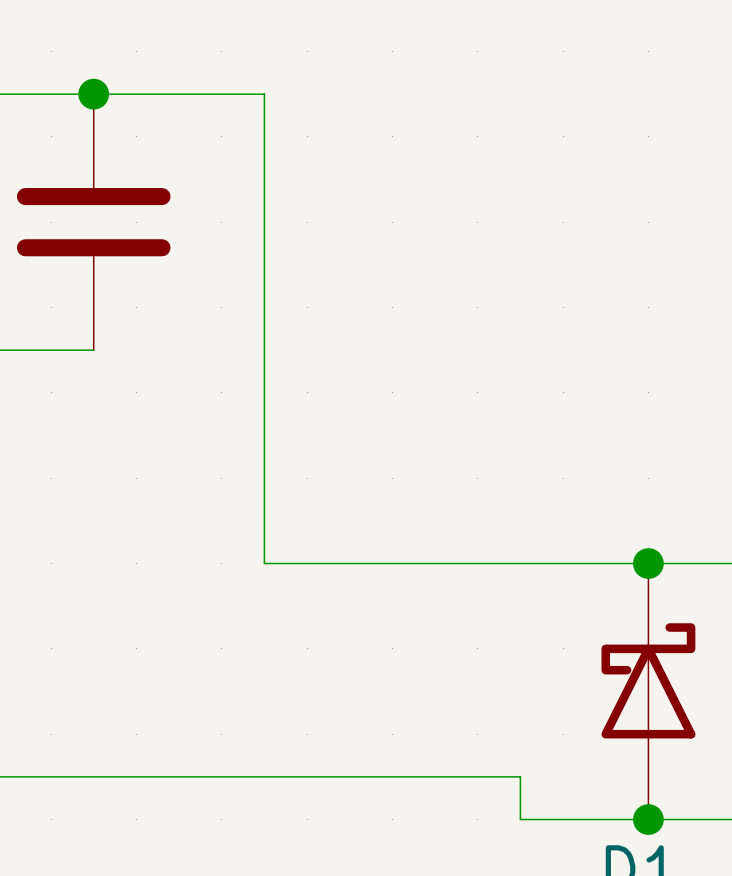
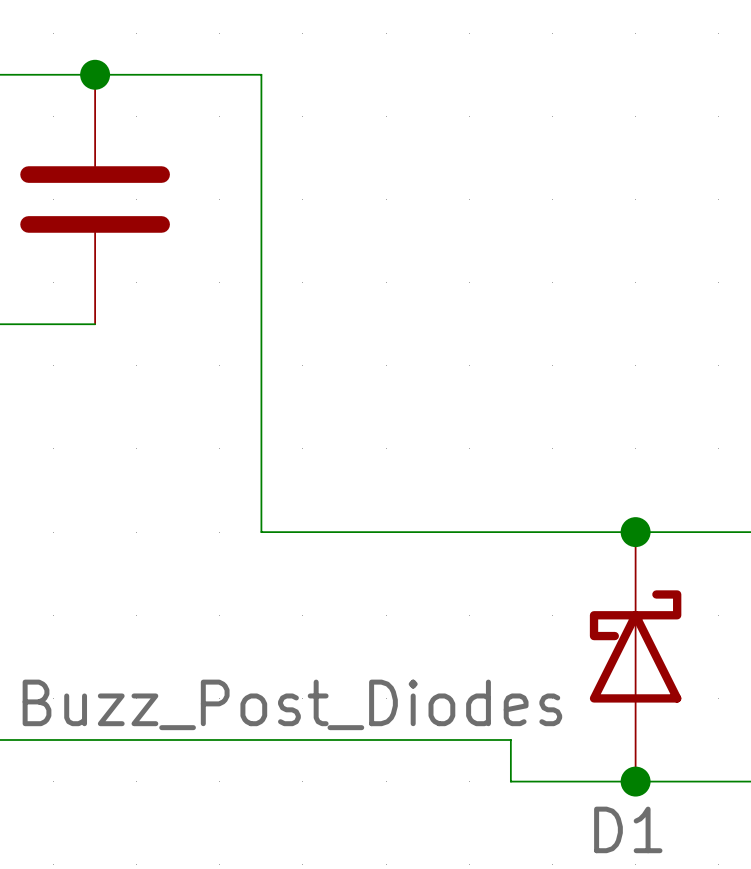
label: none -> Buzz_Post_Diodes (292, 704)

